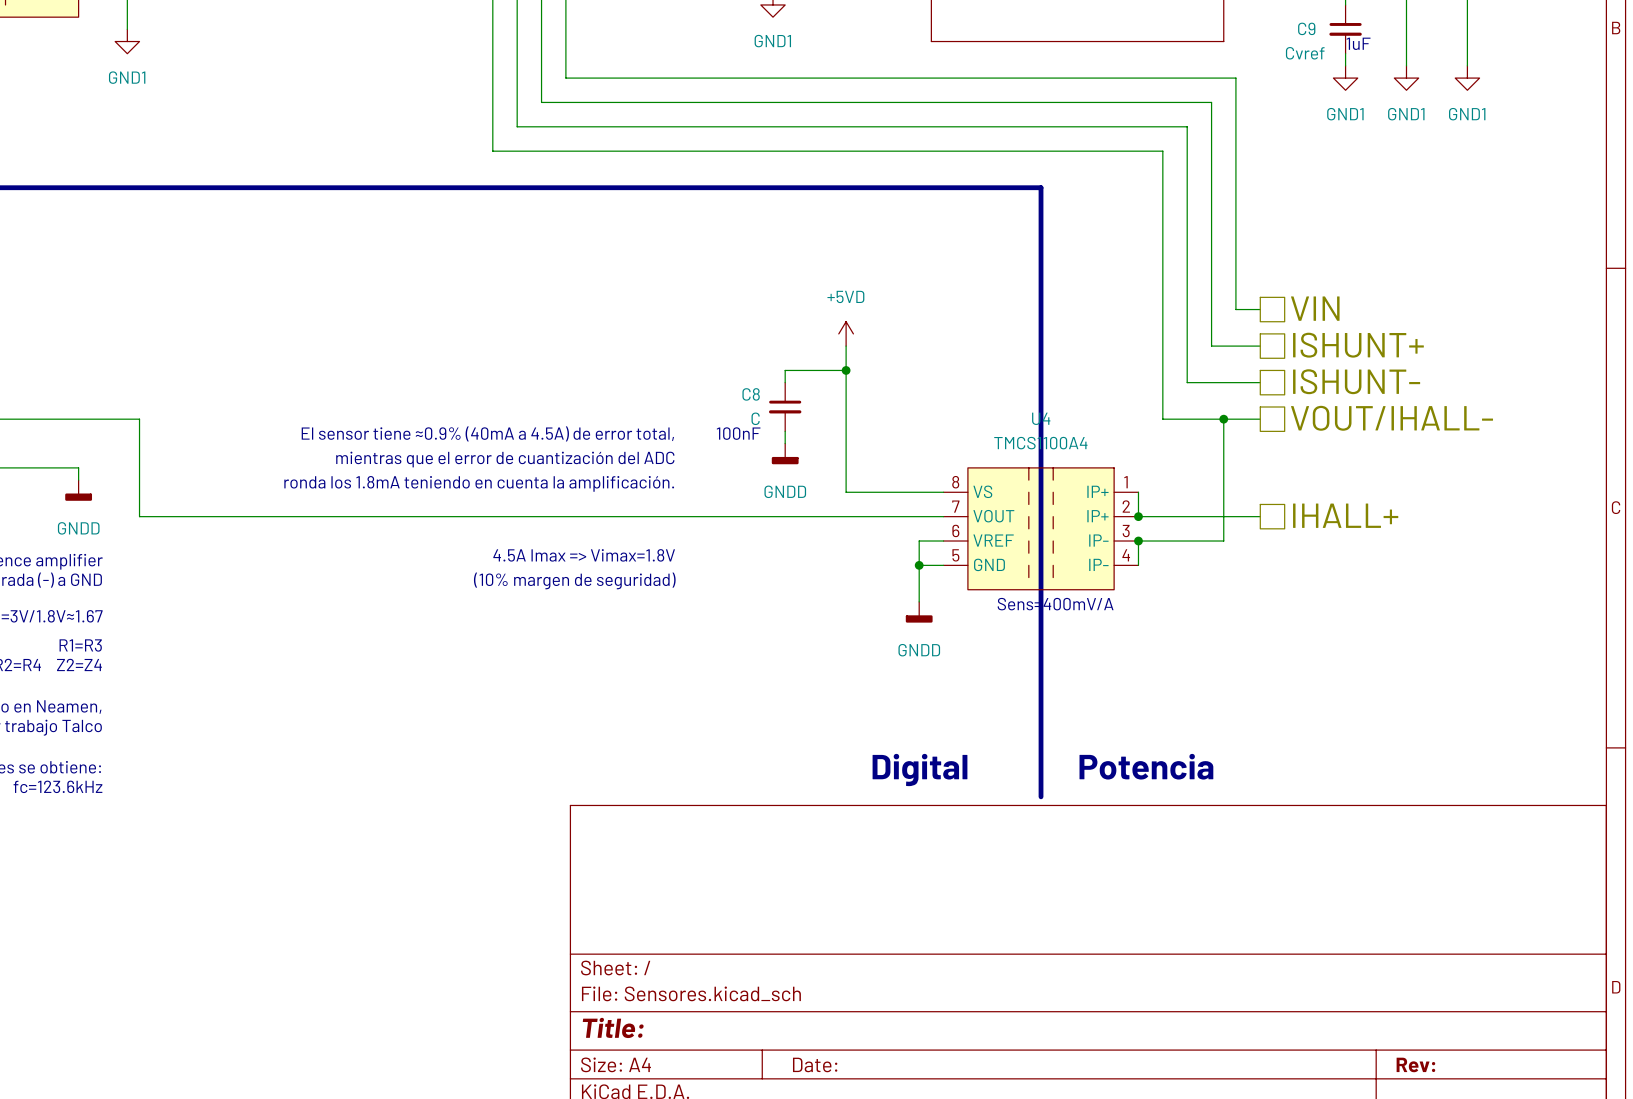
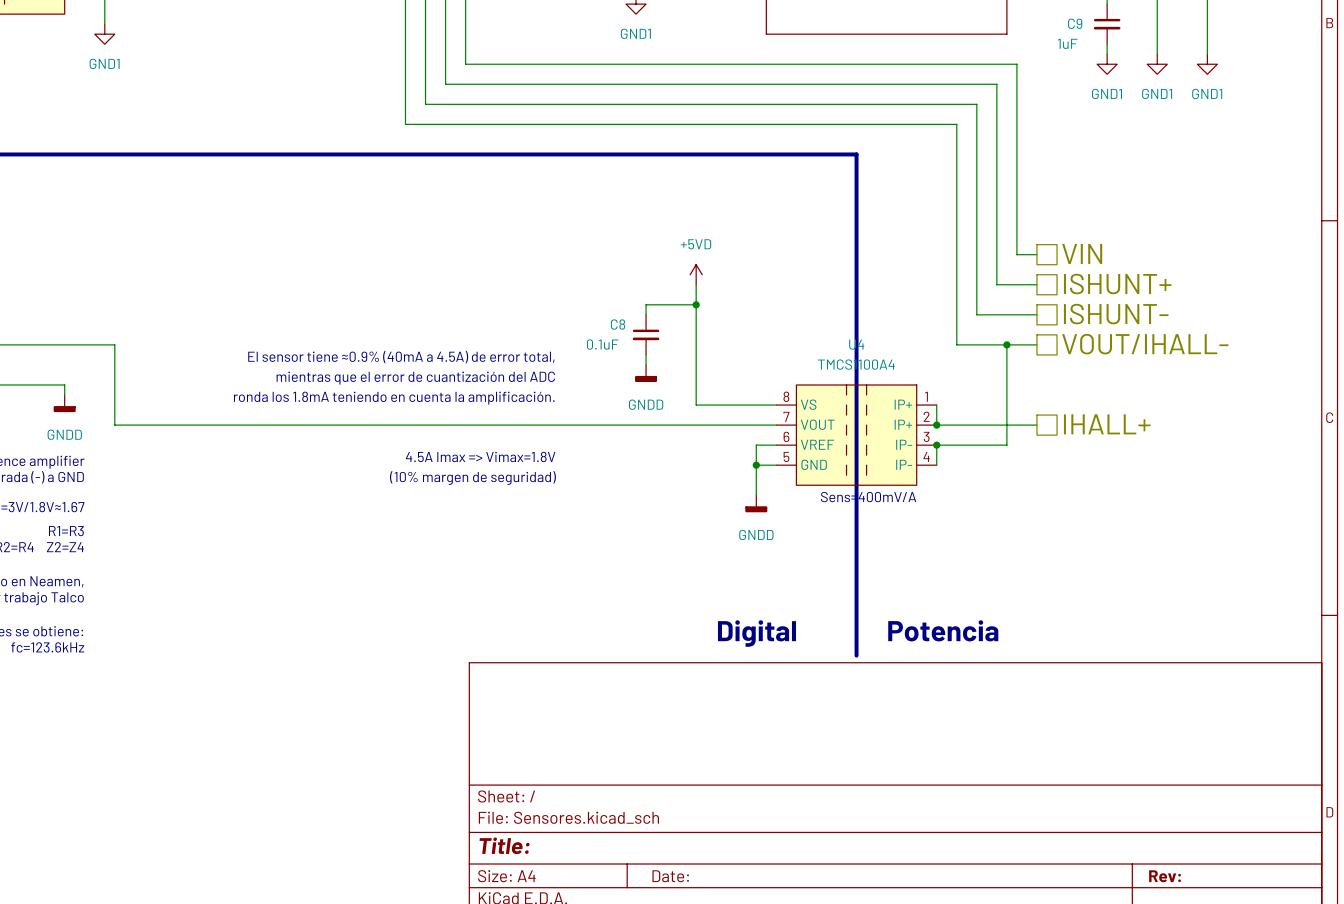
text: 1uF (1358, 43) -> none
C9 value: Cvref (1305, 53) -> 1uF (1067, 43)
C8 value: C (755, 418) -> 0.1uF (602, 344)
text: 100nF (738, 433) -> none

